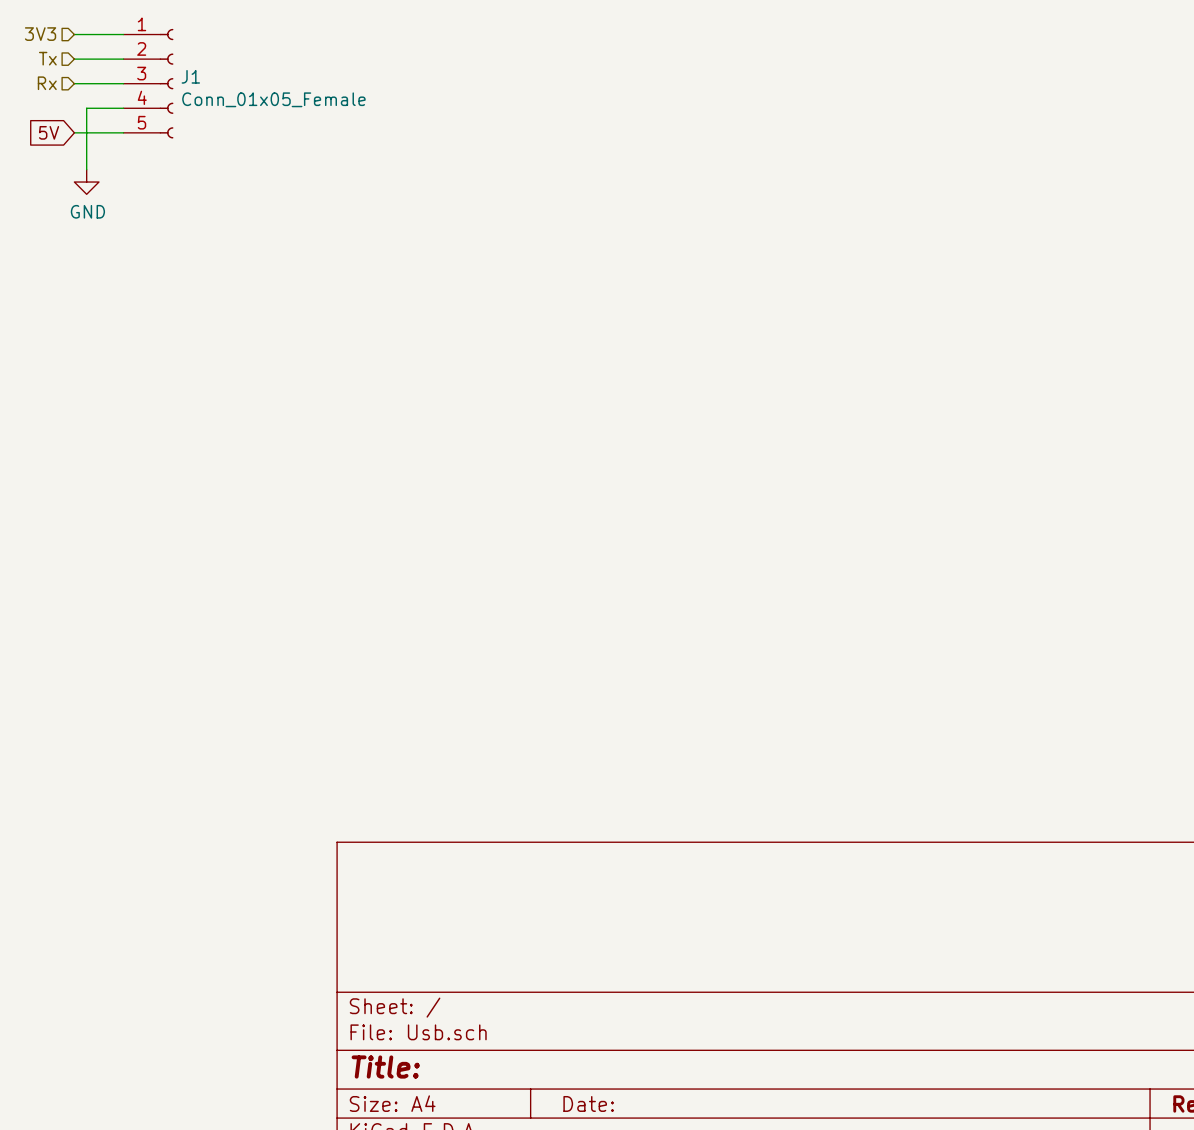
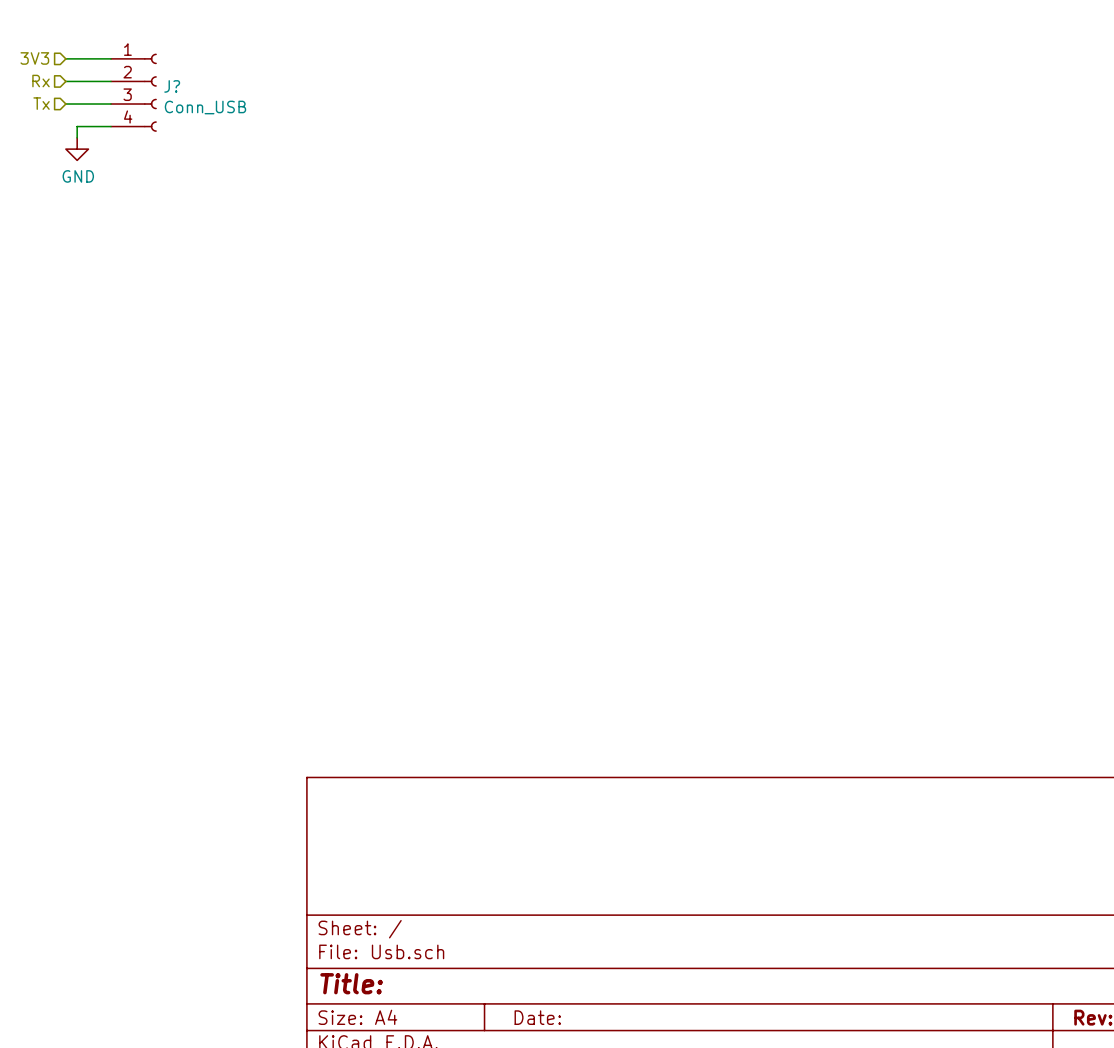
hierarchical label: 3V3 (40, 34) -> none
wire: (74, 34) (123, 34) -> none
hierarchical label: Tx (47, 58) -> 3V3 (34, 58)
J1: Conn_01x05_Female (148, 83) -> none
J?: none -> Conn_USB (133, 92)
hierarchical label: none -> Tx (41, 103)
wire: (86, 108) (86, 132) (74, 132) -> (77, 104) (65, 104)
global label: 5V (49, 132) -> none
power symbol position: GND (86, 182) -> GND (77, 149)

